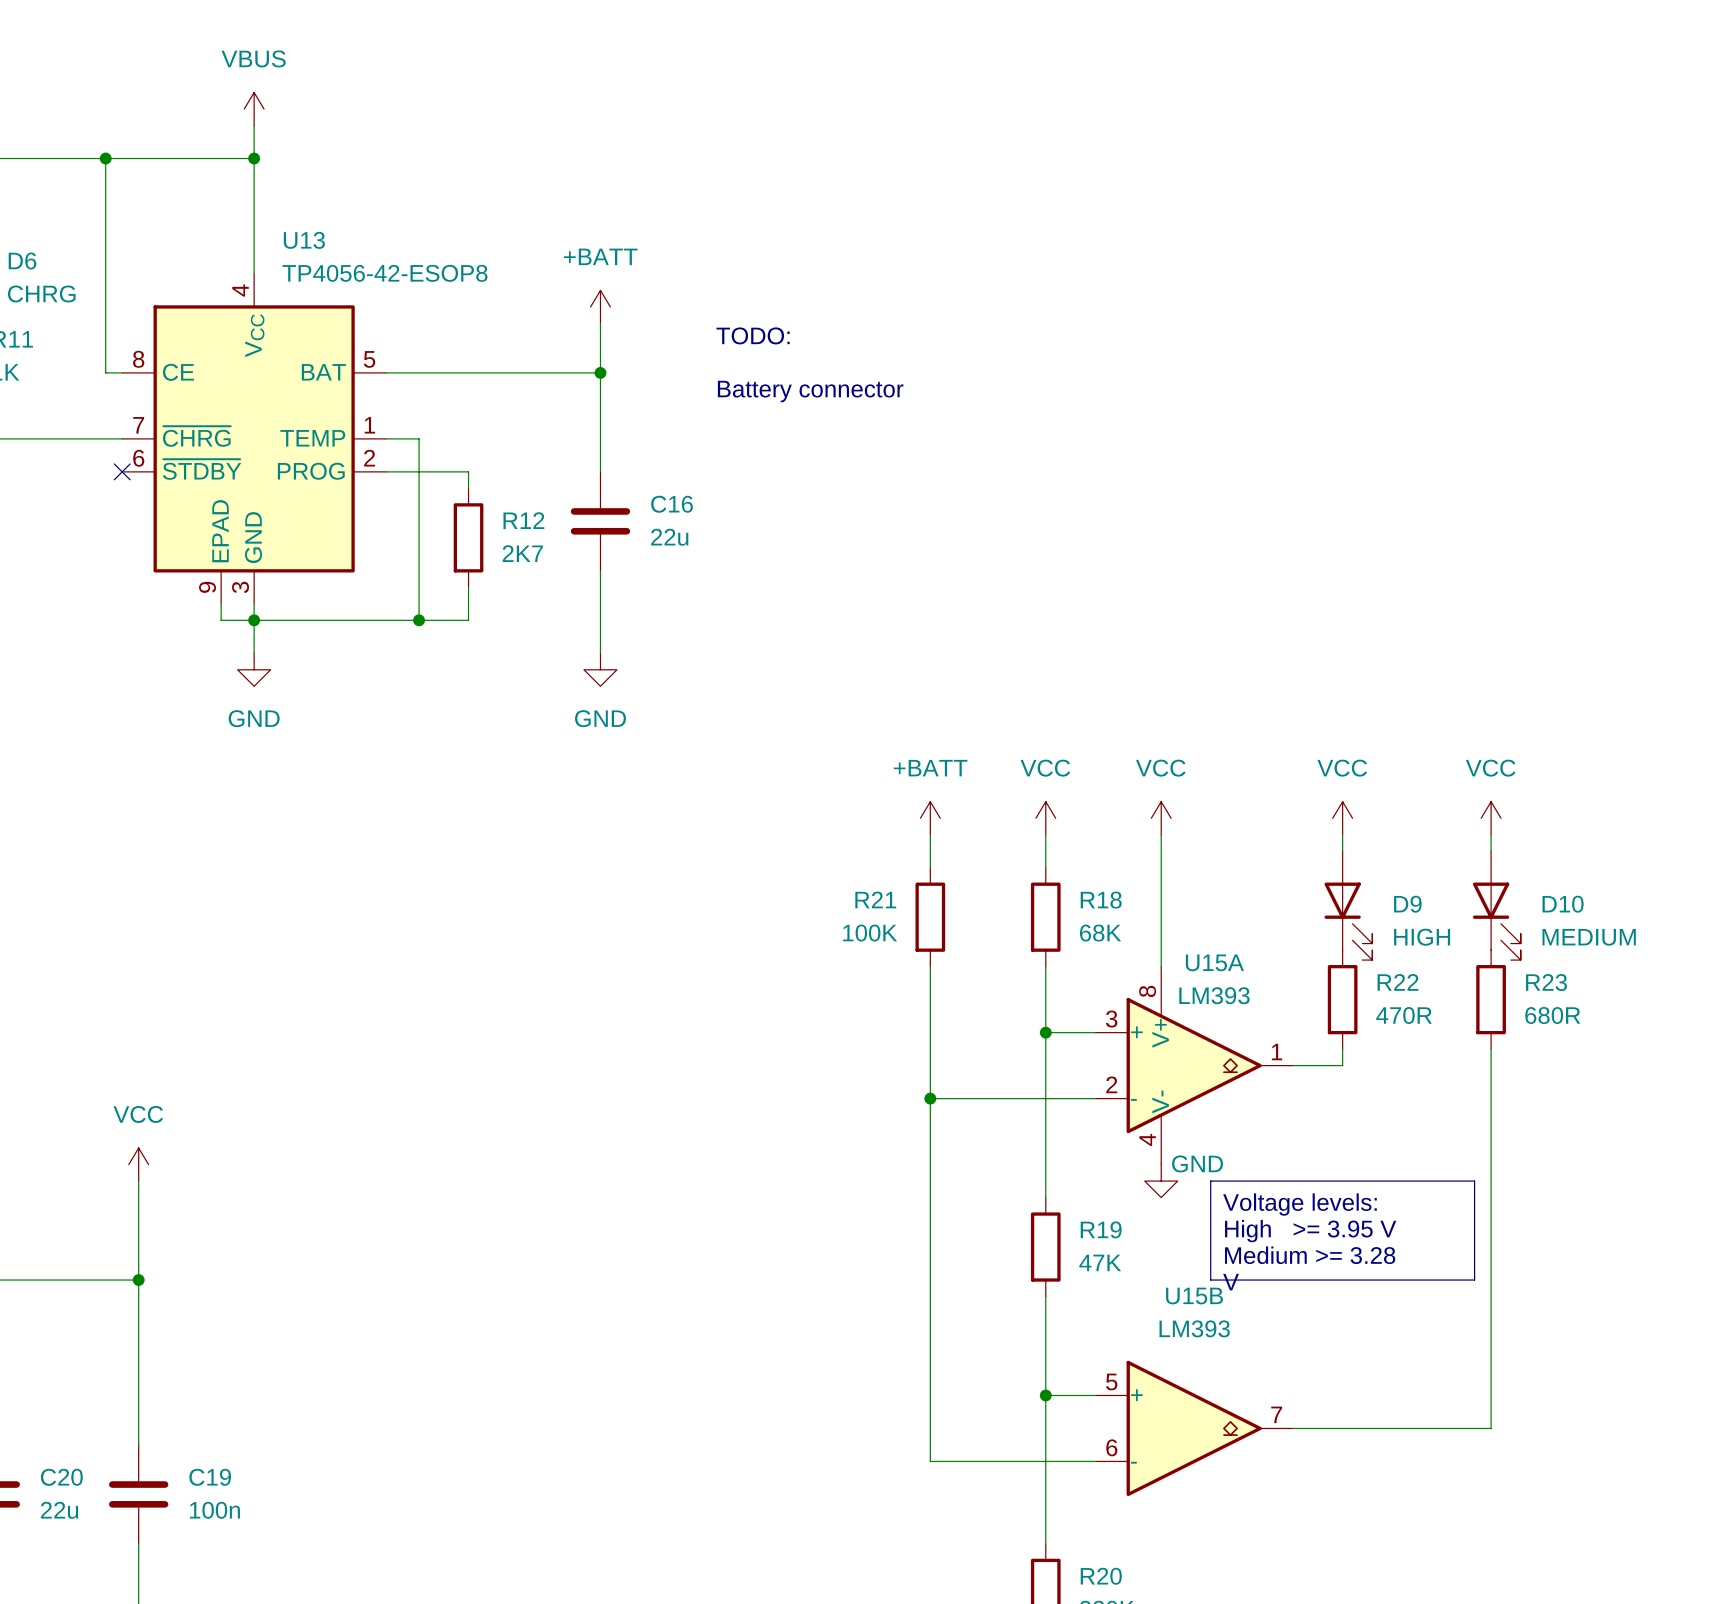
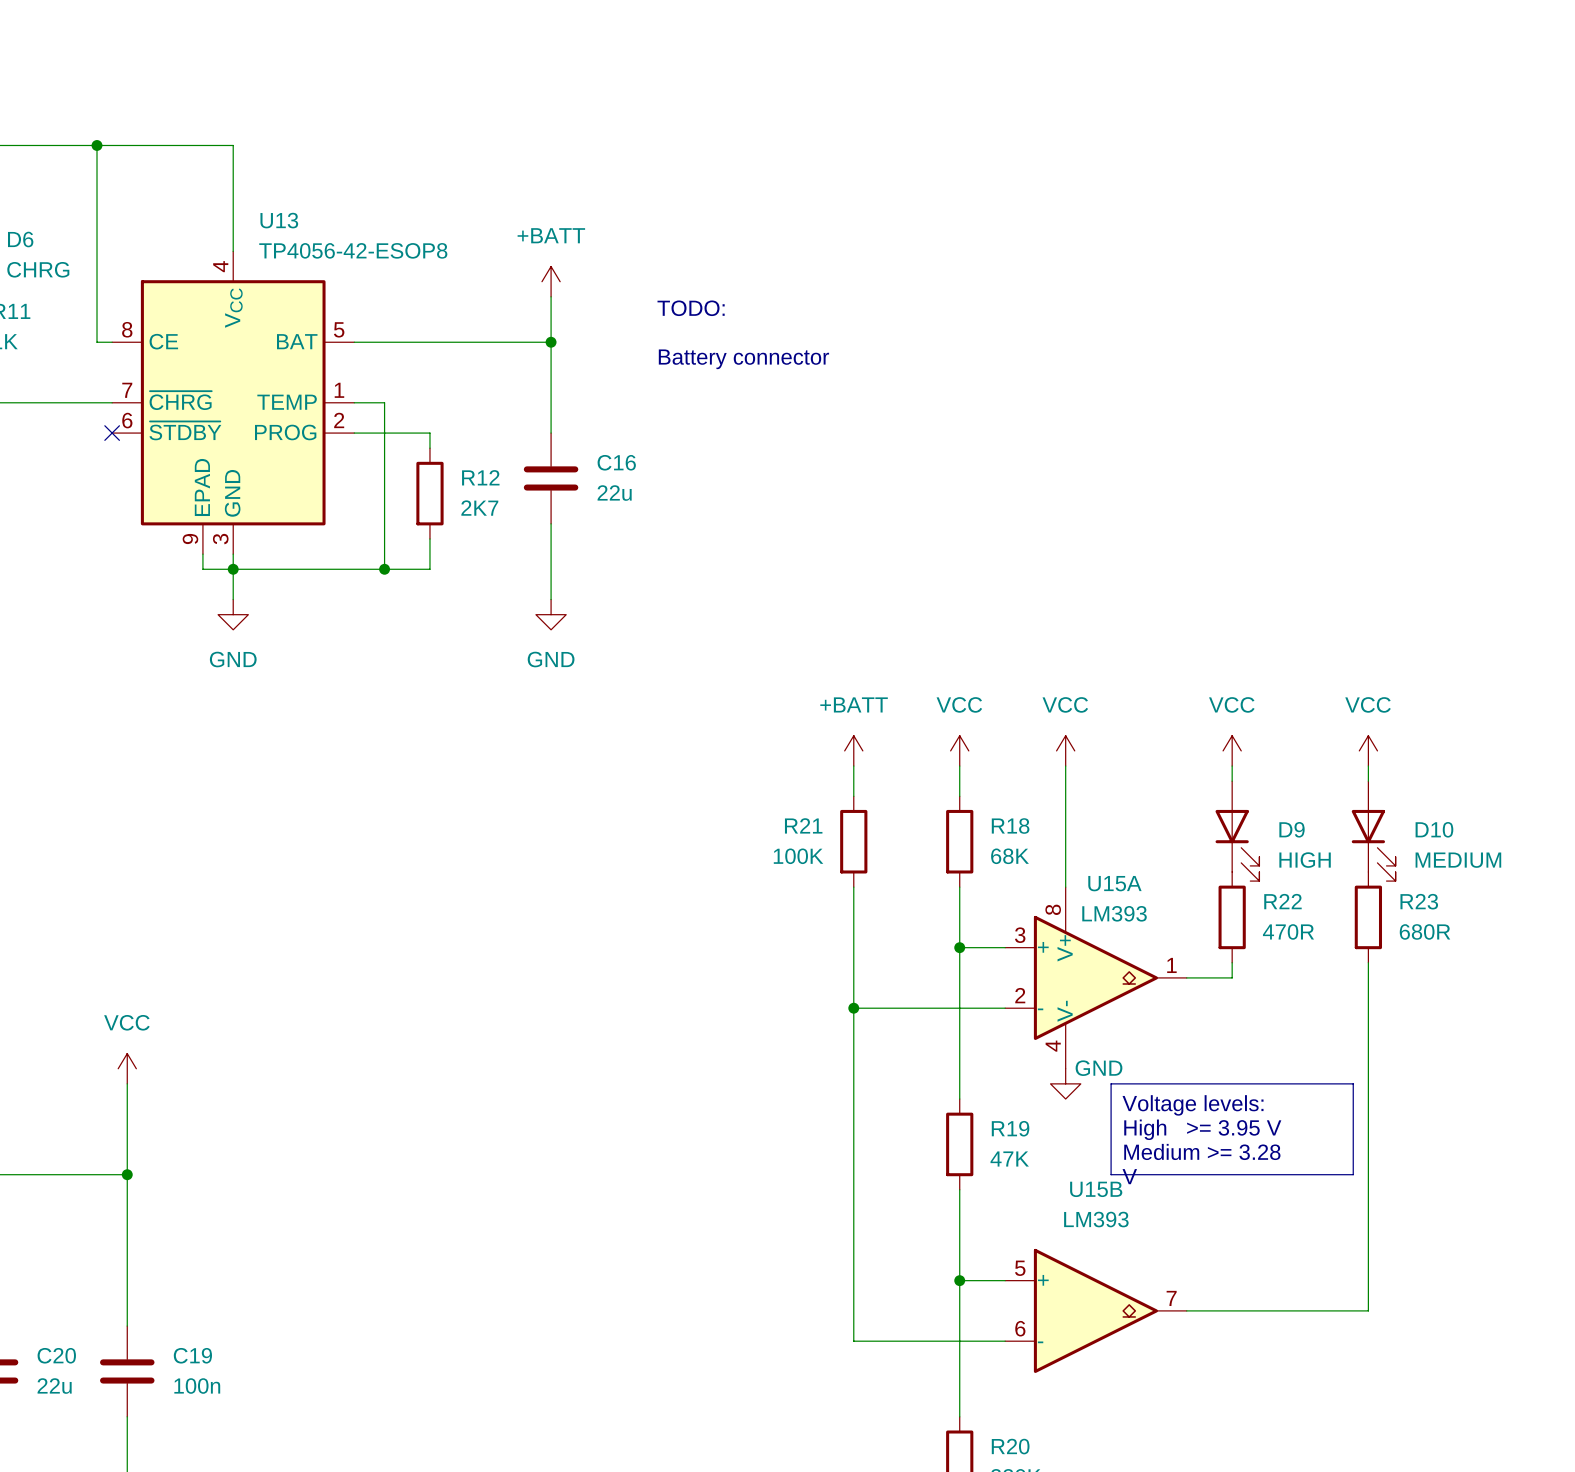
power symbol: VBUS (254, 109) -> none
wire: (254, 125) (254, 158) -> none
junction: (254, 158) -> none

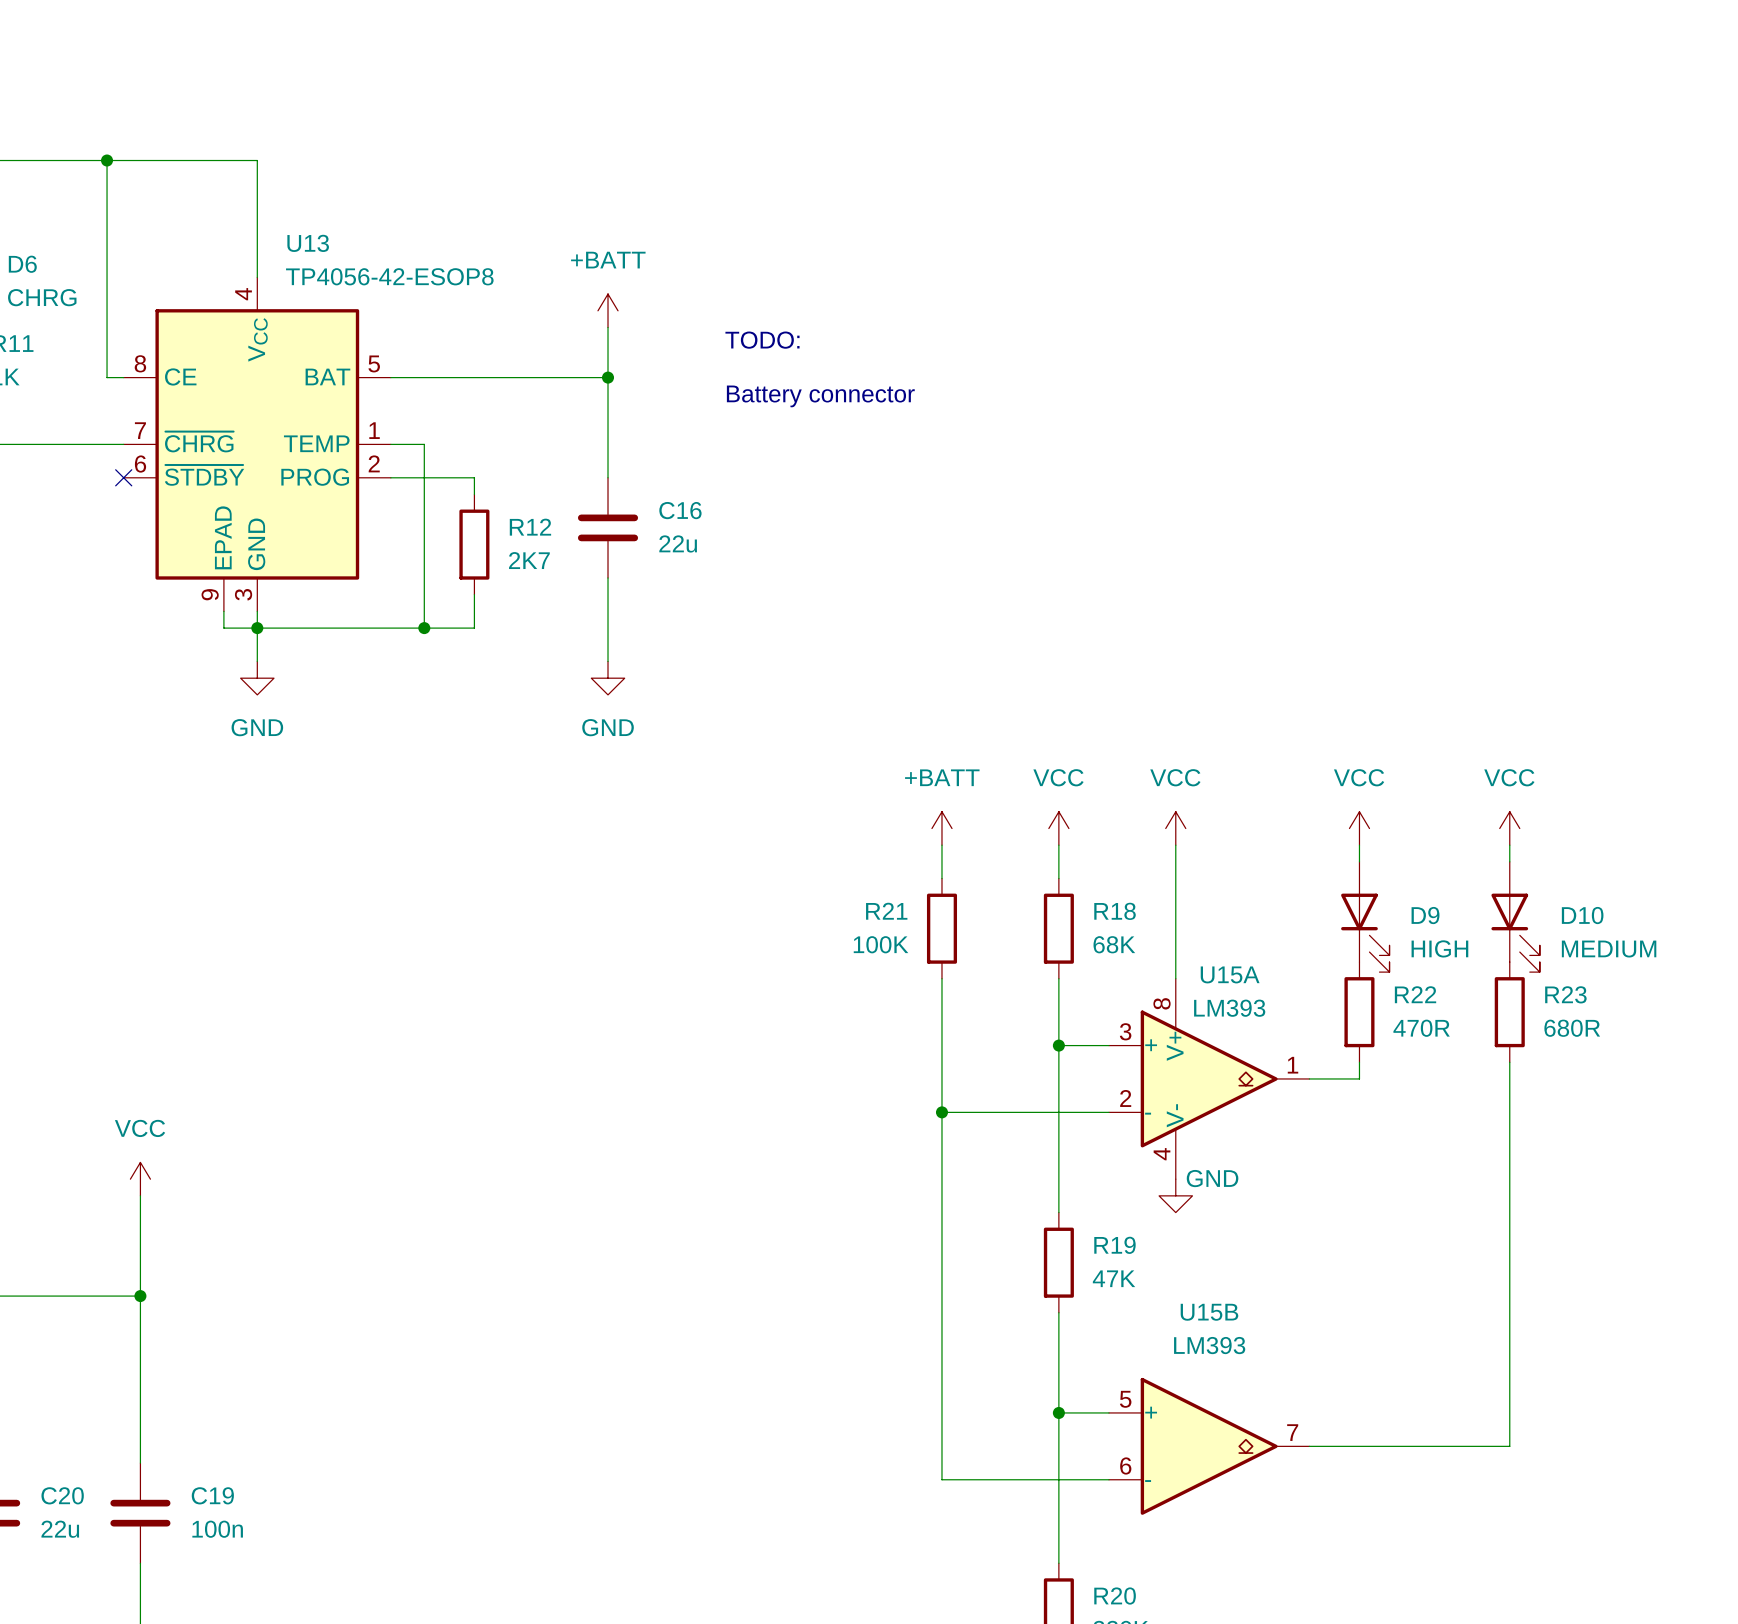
line: (1111, 1083) (1353, 1083) (1353, 1174) (1111, 1174) (1111, 1083) -> none
text: Voltage levels: (1193, 1105) -> none
text: High >= 3.95 V (1202, 1129) -> none
text: Medium >= 3.28 (1202, 1151) -> none
text: V (1129, 1176) -> none

